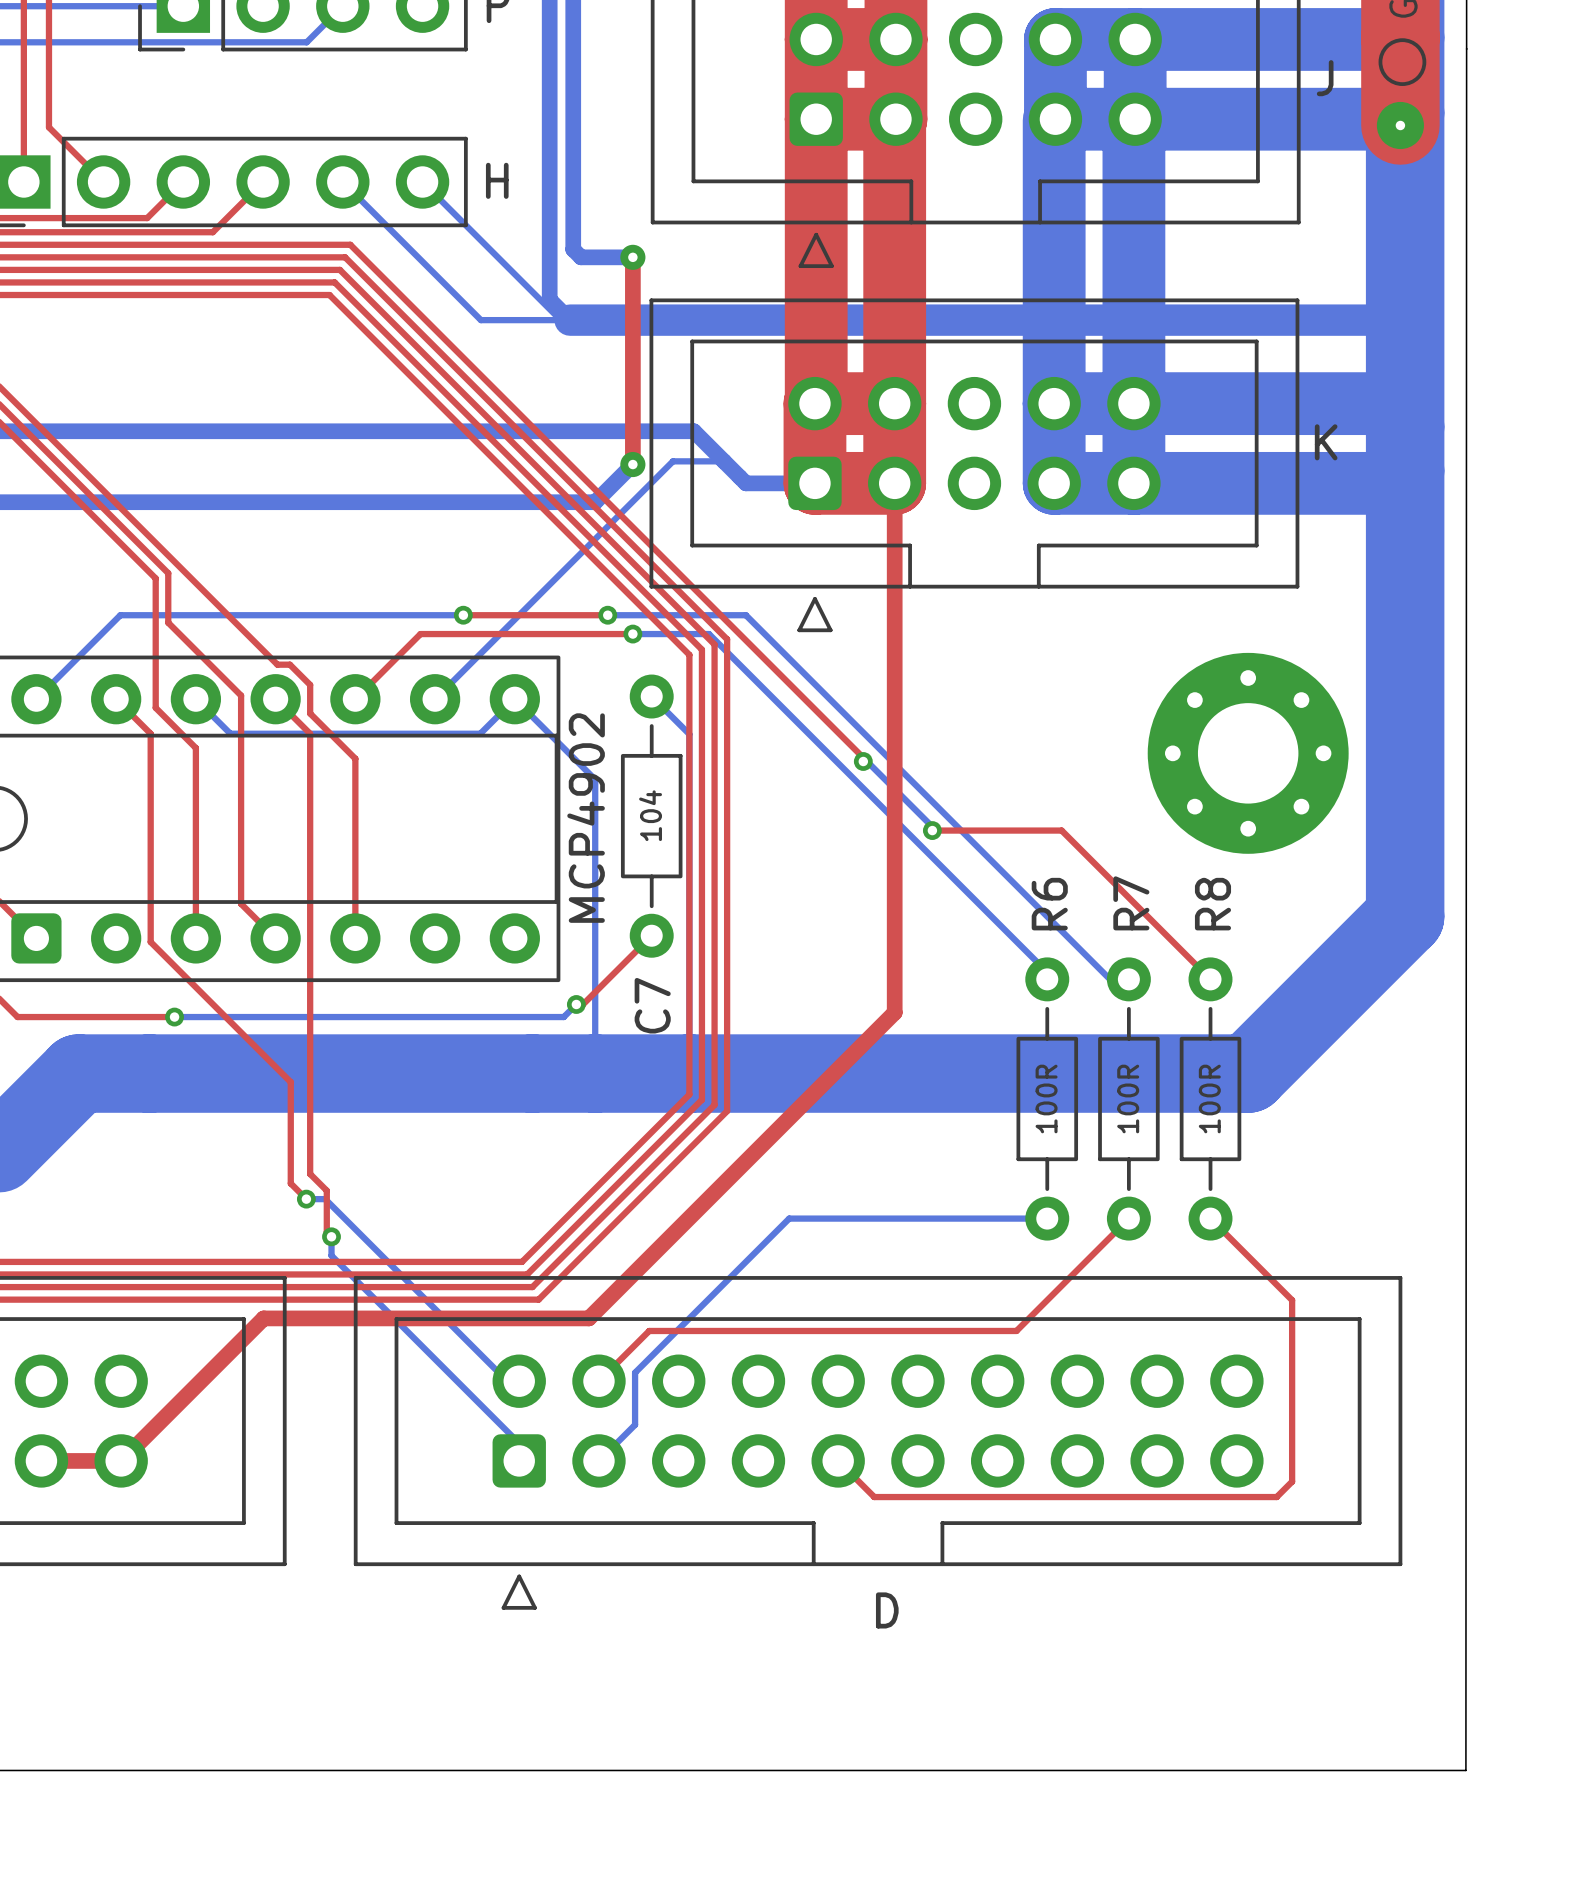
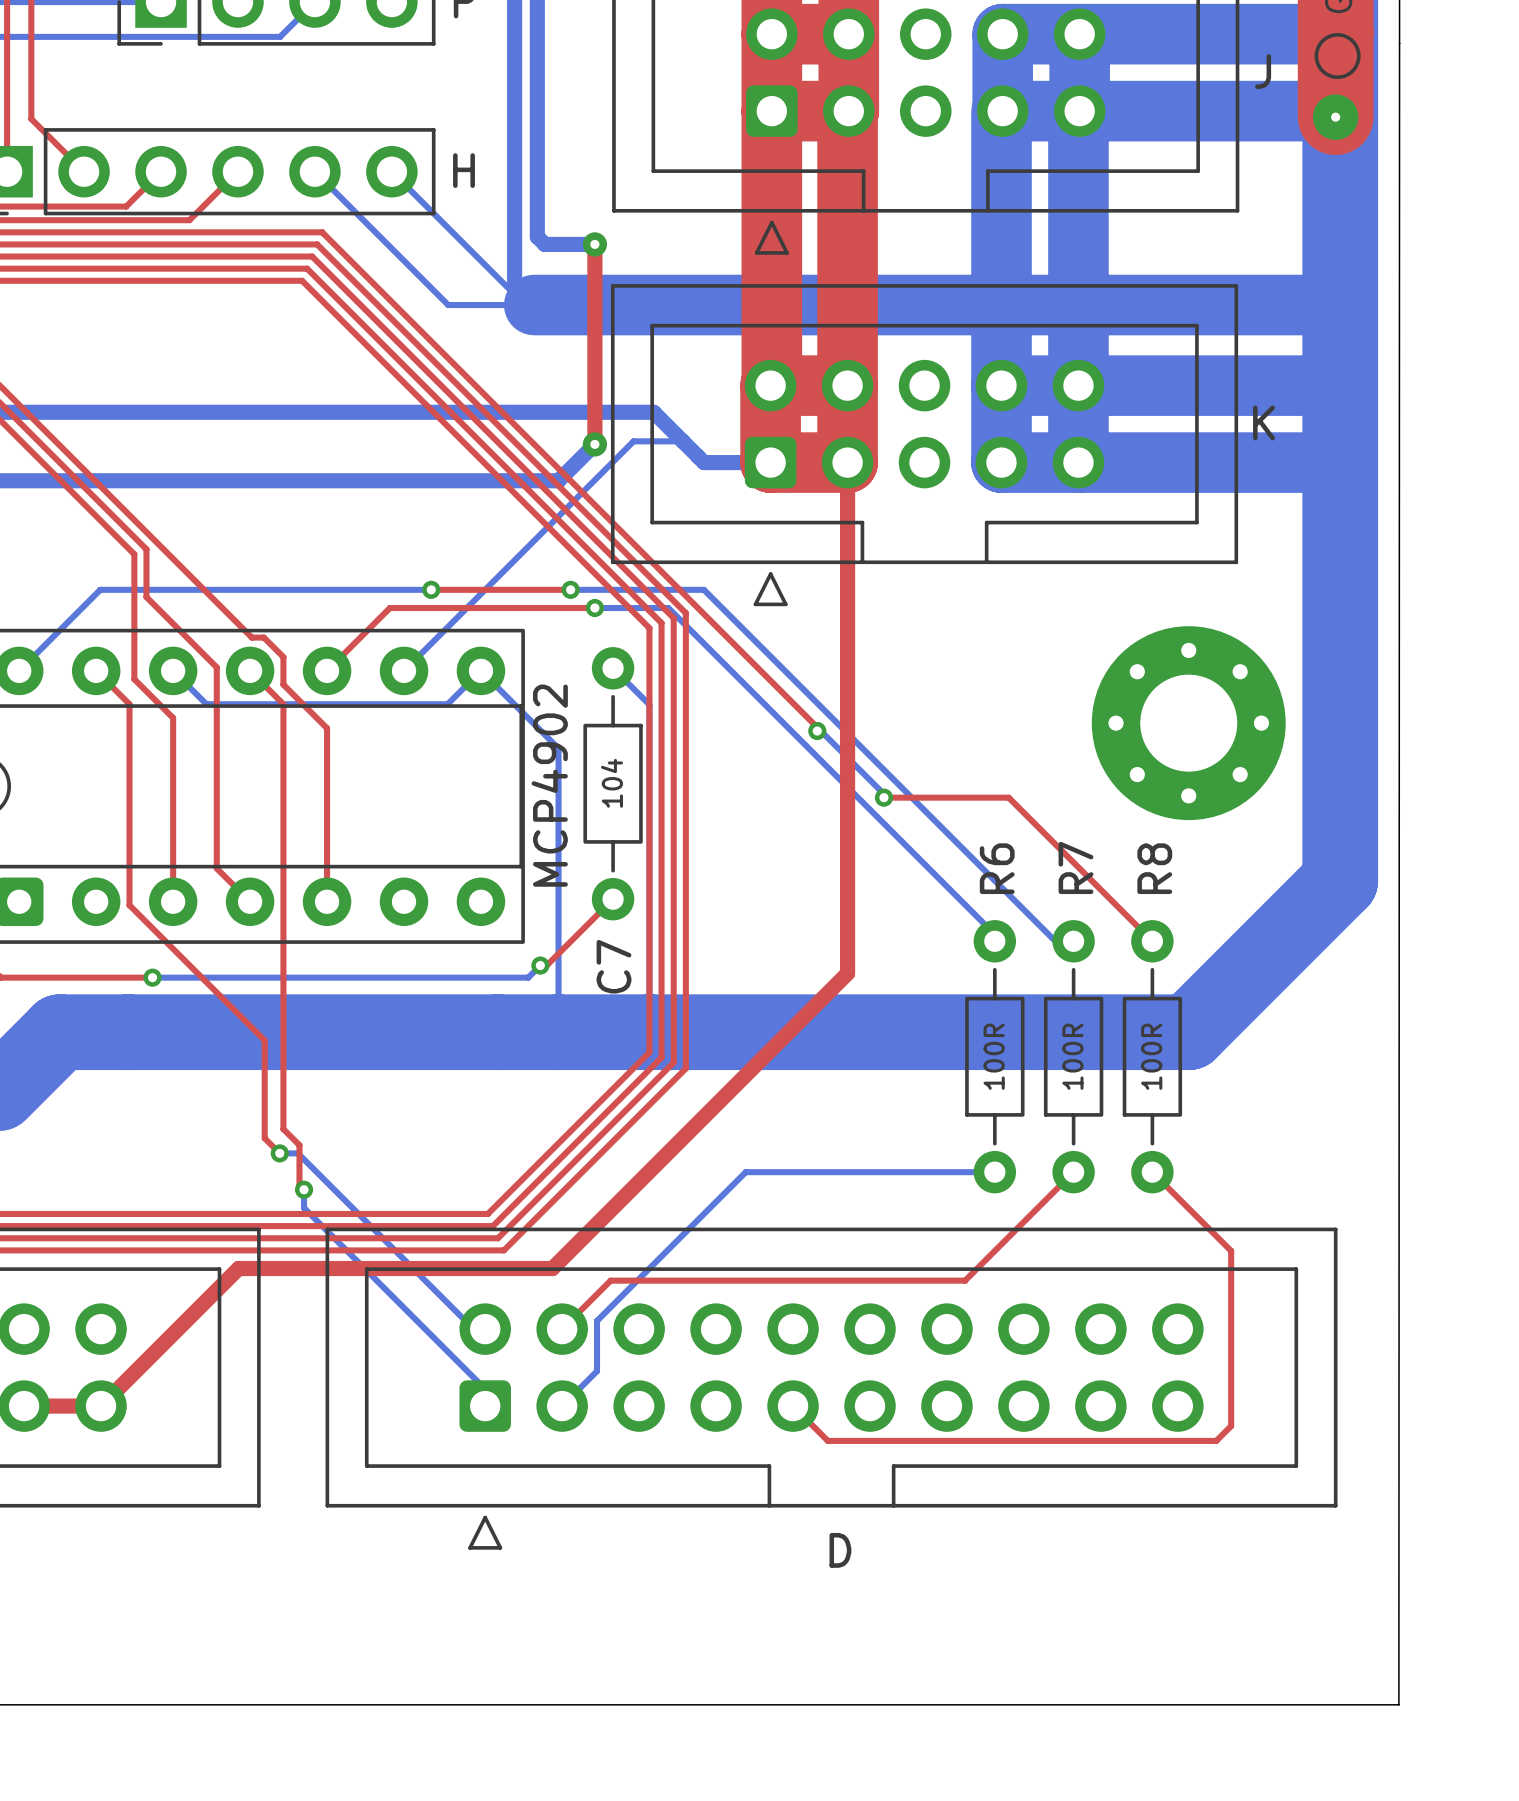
bottom track width: thin (570, 320) (896, 320) -> thick (534, 305) (849, 305)
bottom track width: thin (902, 320) (1381, 320) -> thick (855, 305) (1317, 305)

